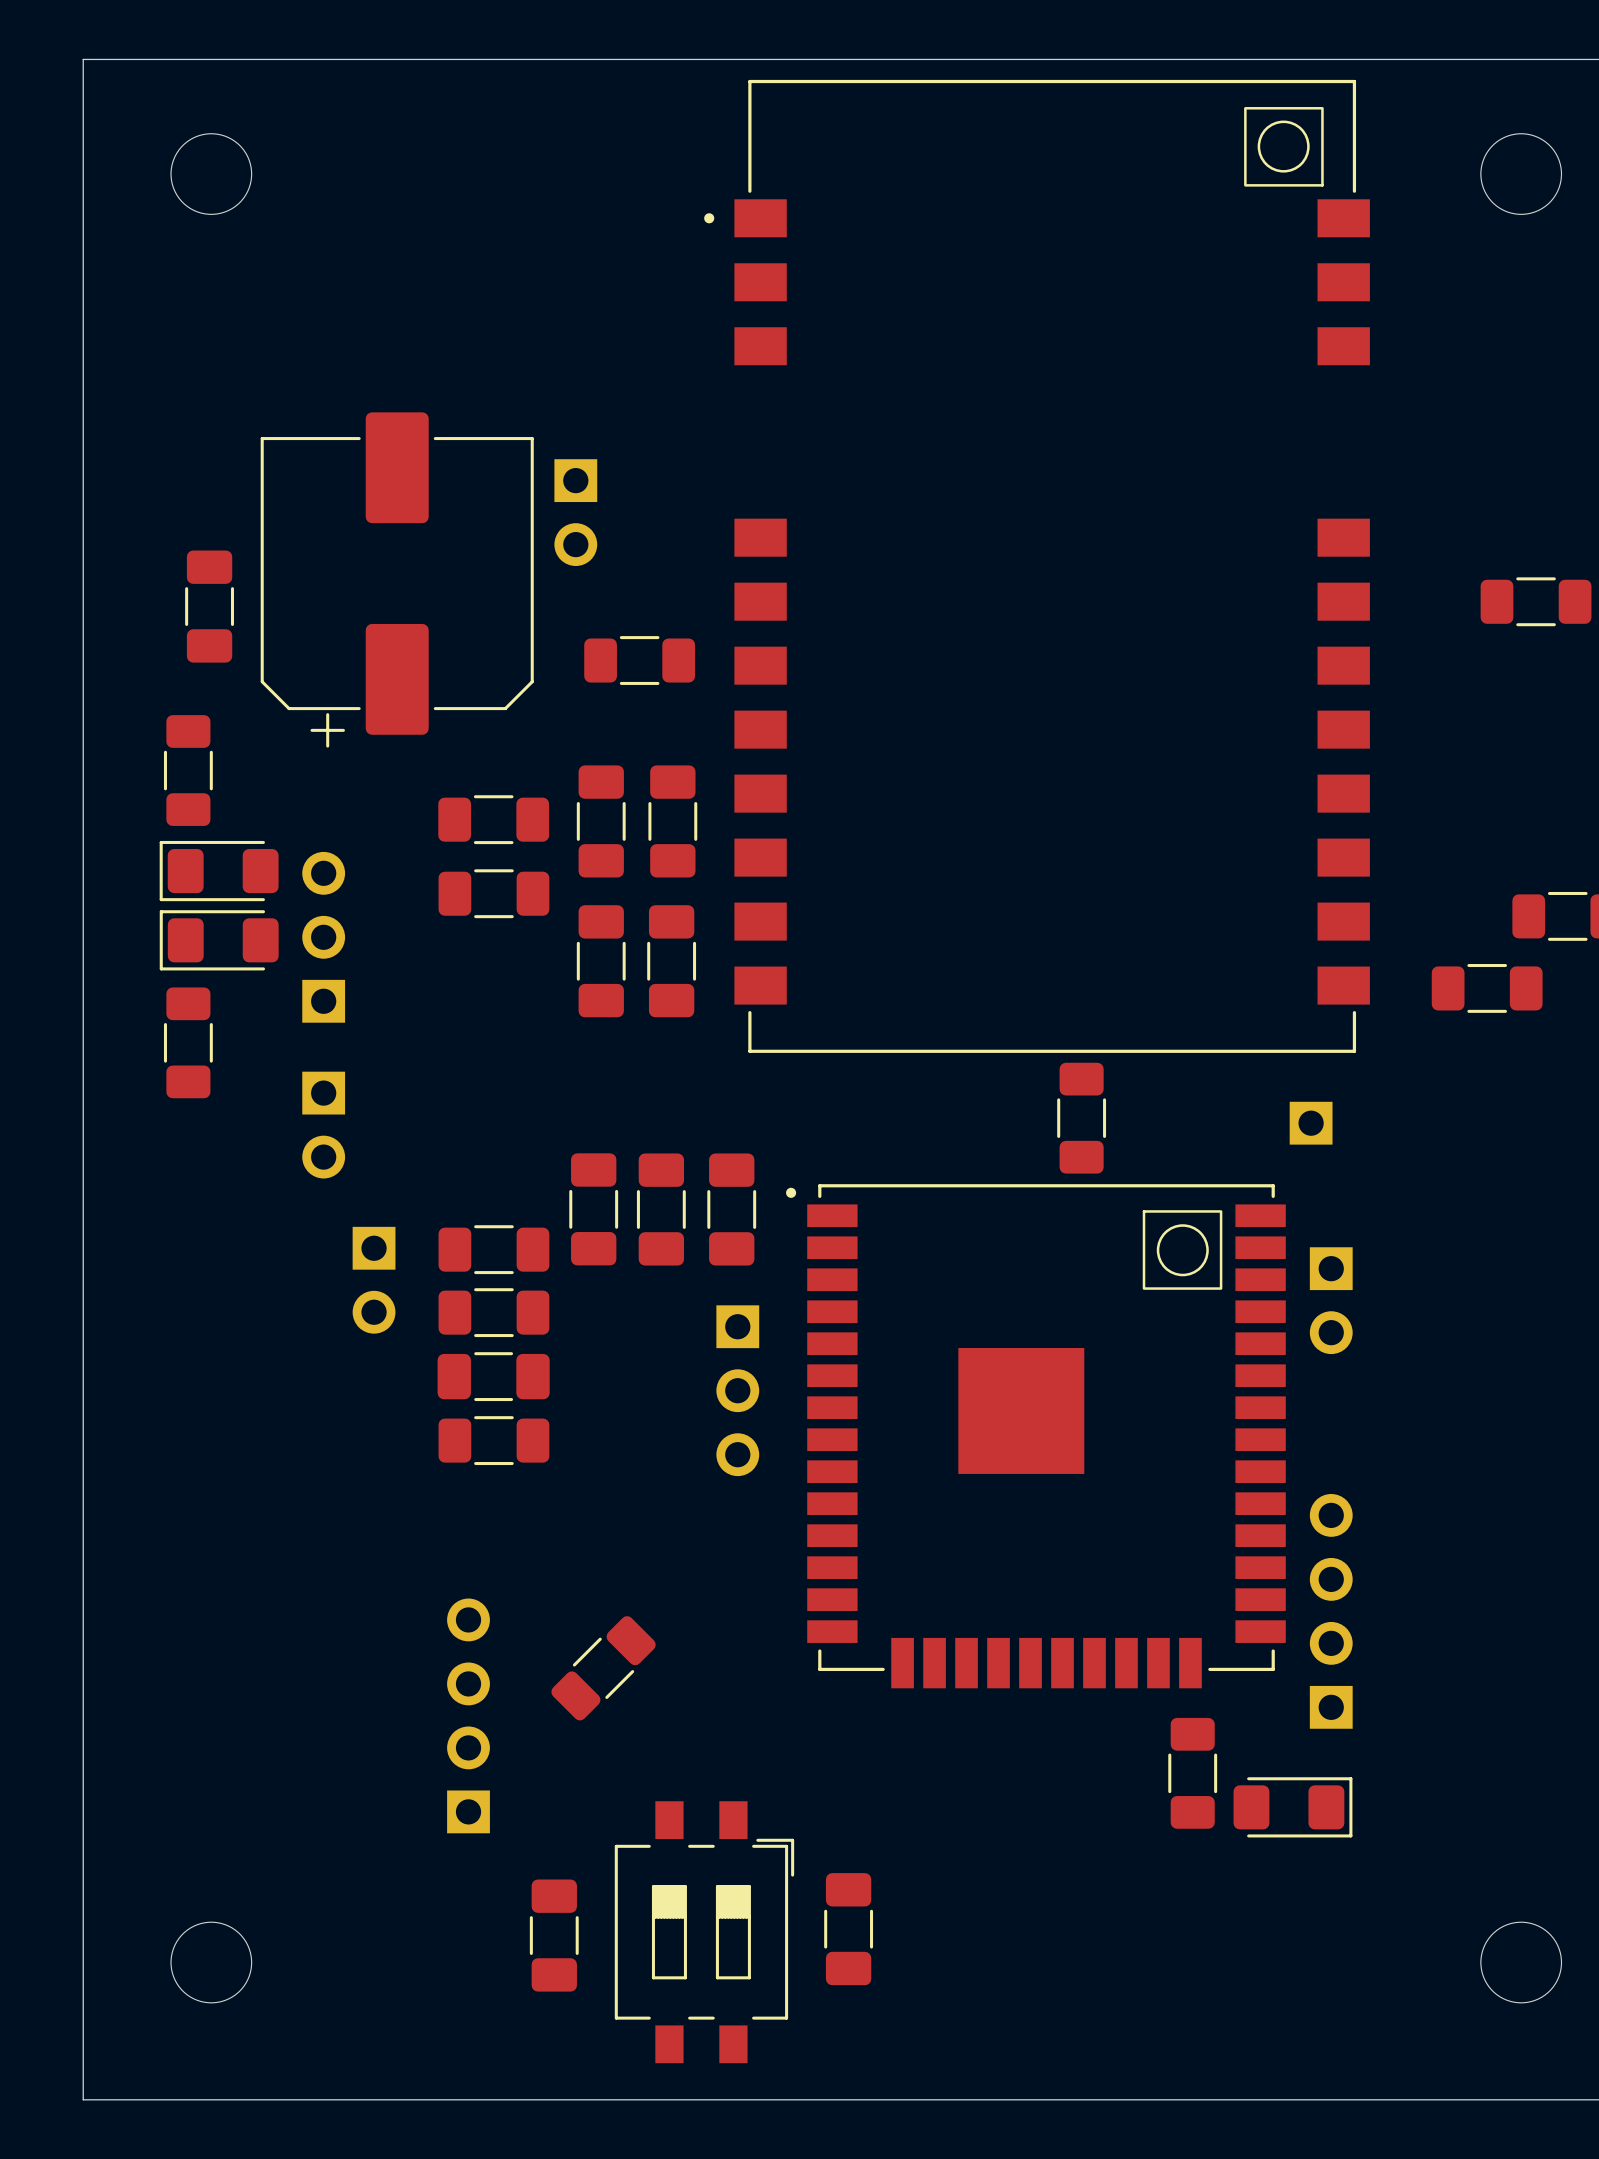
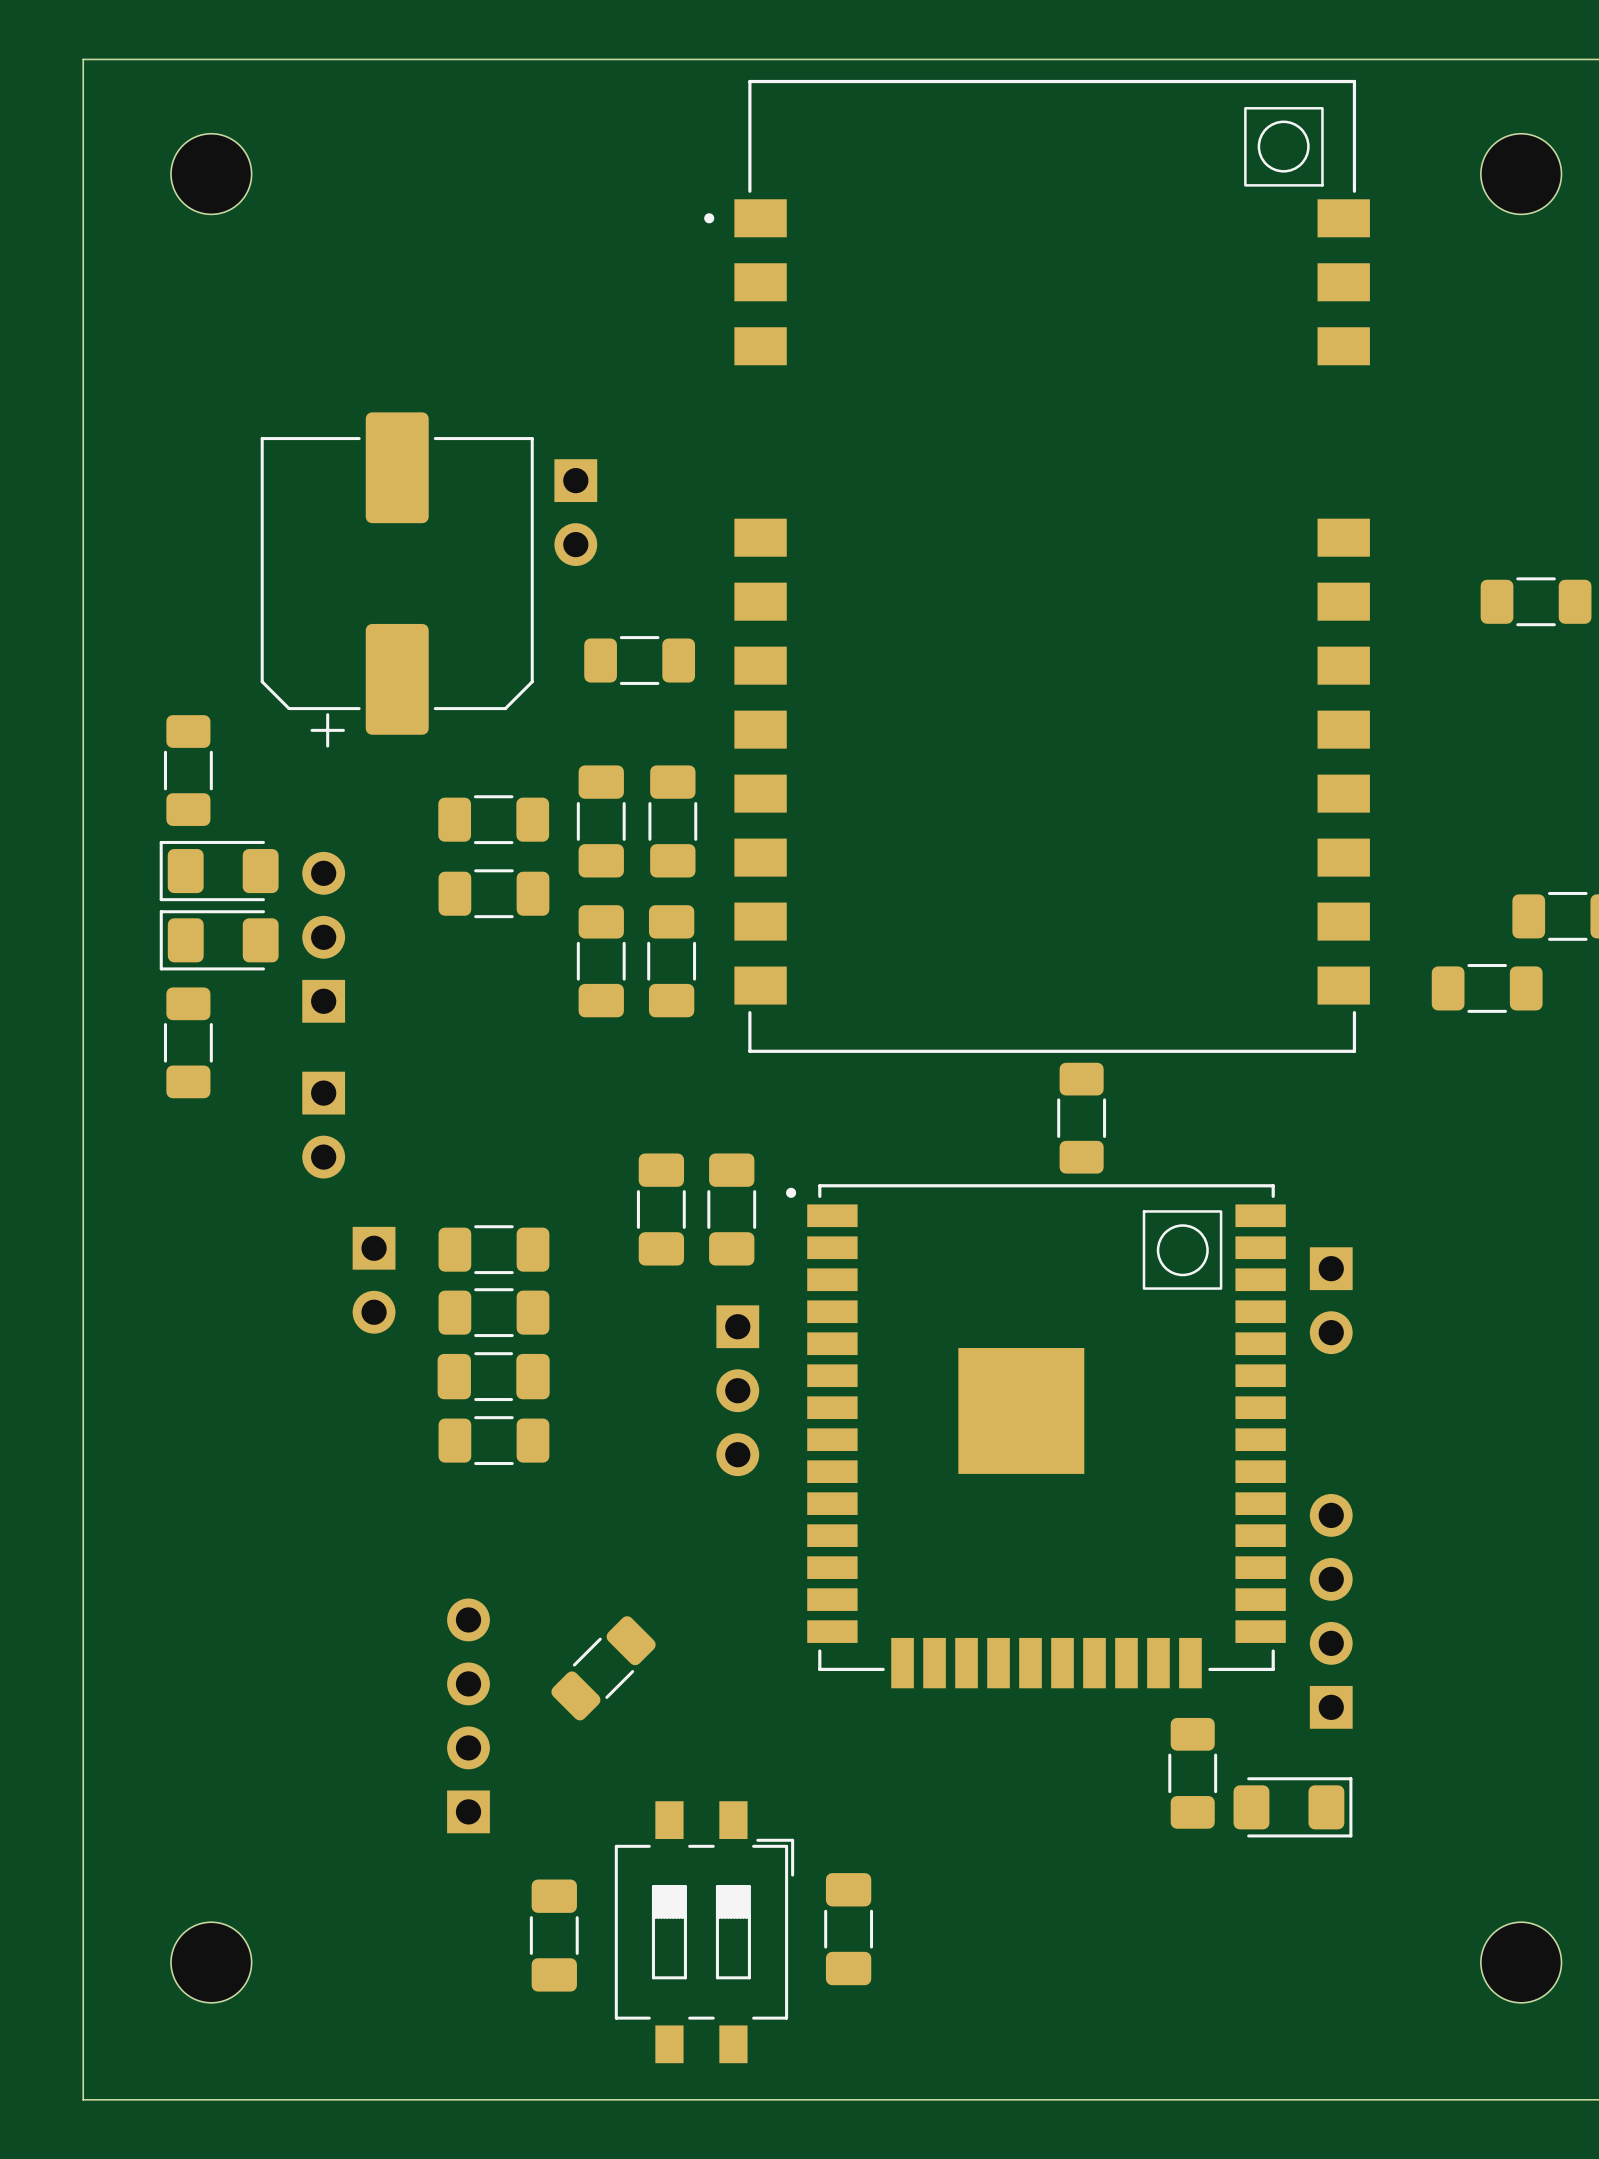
part: (209, 606) -> none
part: (1311, 1123) -> none
part: (593, 1209) -> none

